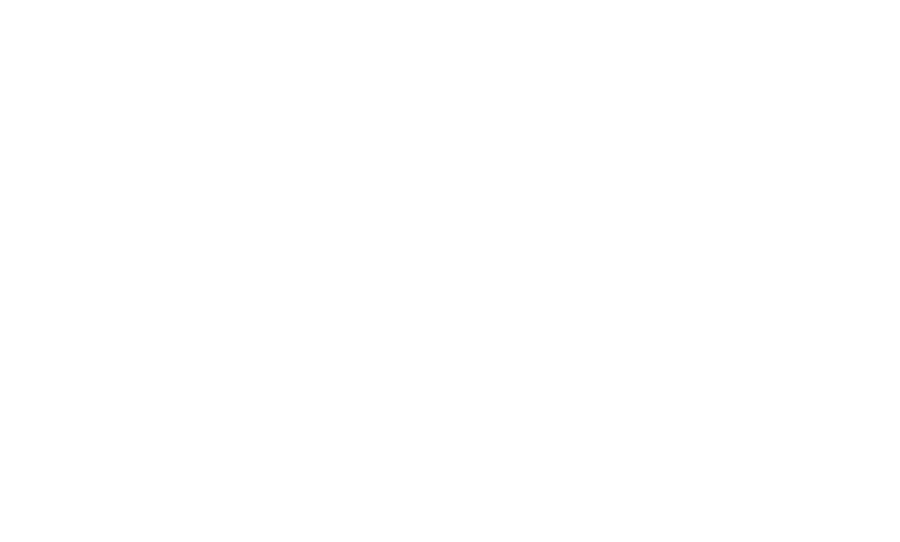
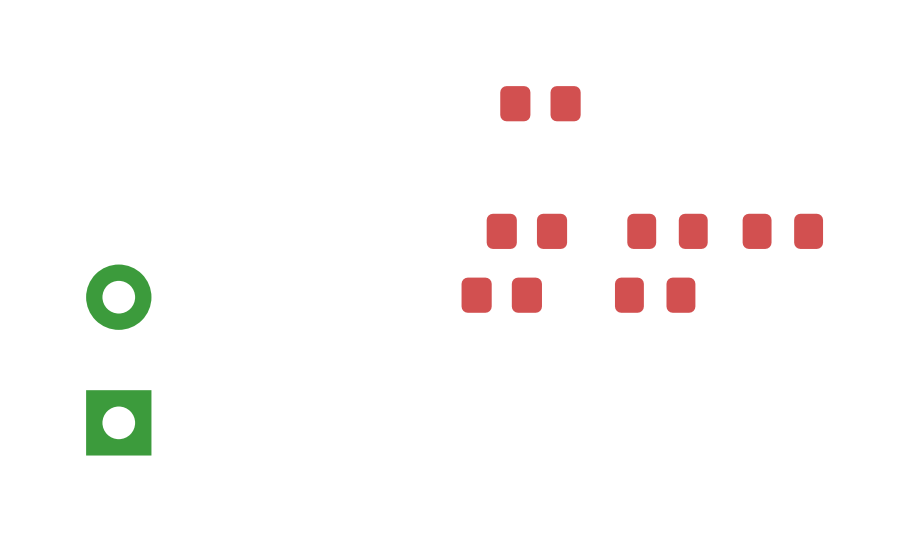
part: none -> (540, 103)
part: none -> (526, 231)
part: none -> (667, 231)
part: none -> (782, 231)
part: none -> (501, 295)
part: none -> (655, 295)
part: none -> (118, 360)

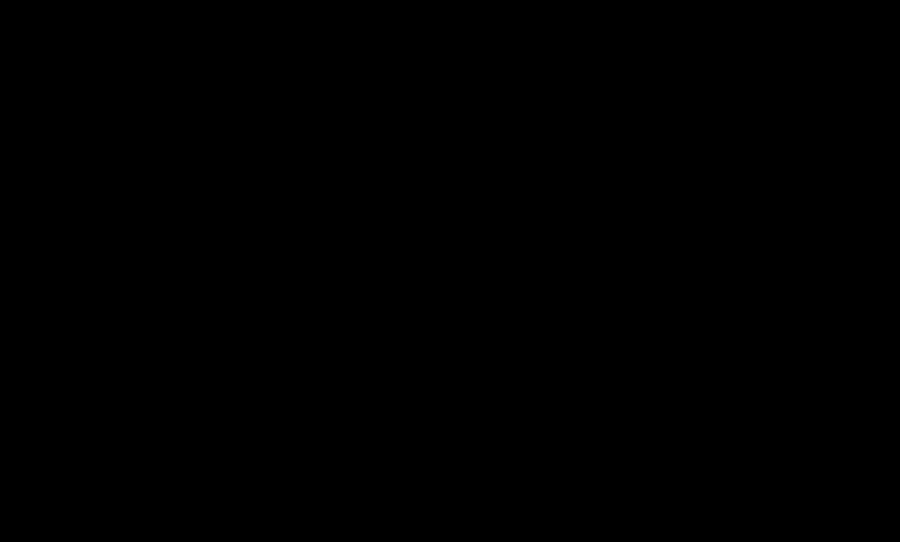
part: (540, 103) -> none
part: (526, 231) -> none
part: (667, 231) -> none
part: (782, 231) -> none
part: (501, 295) -> none
part: (655, 295) -> none
part: (118, 360) -> none

